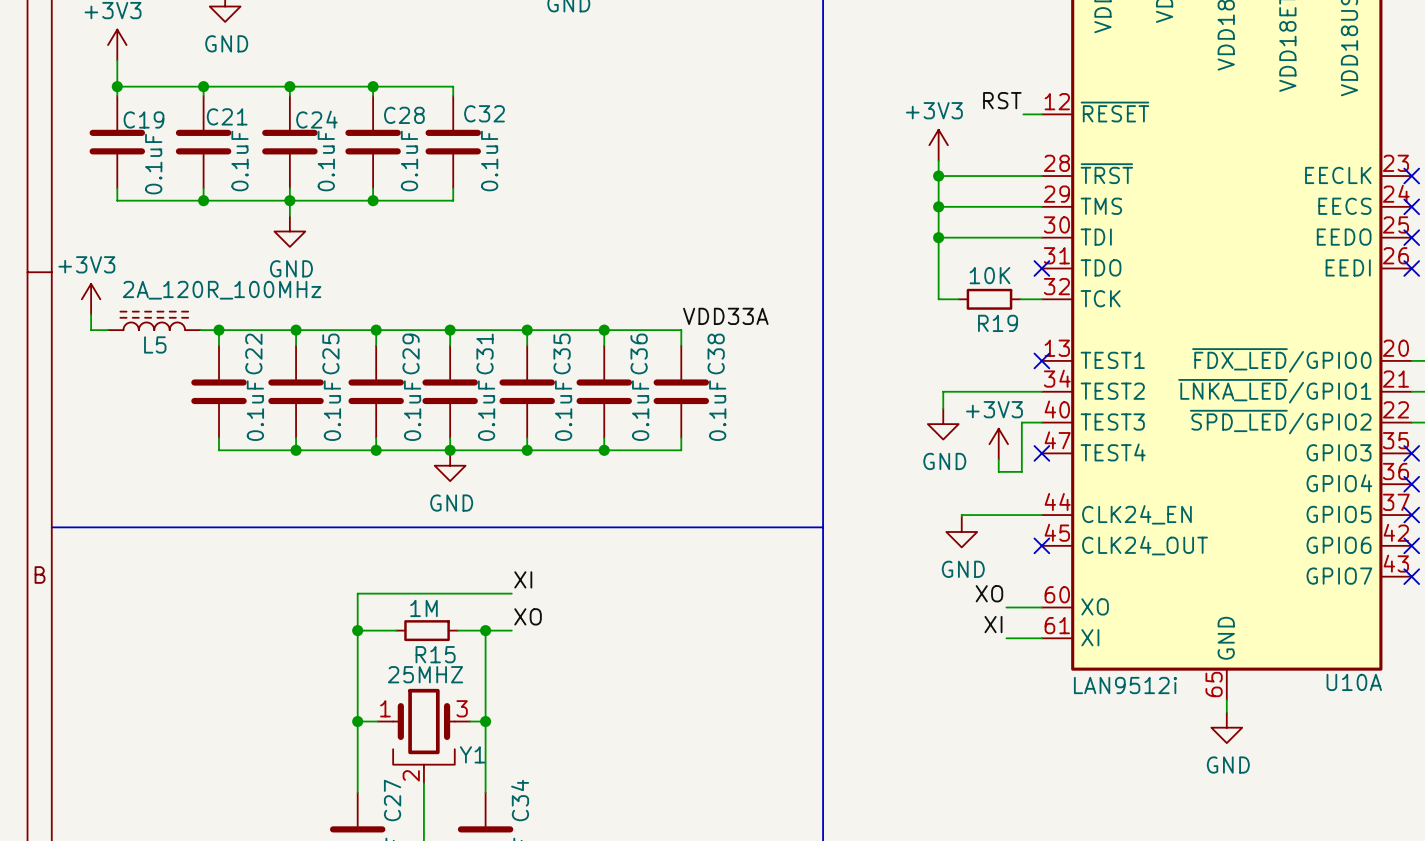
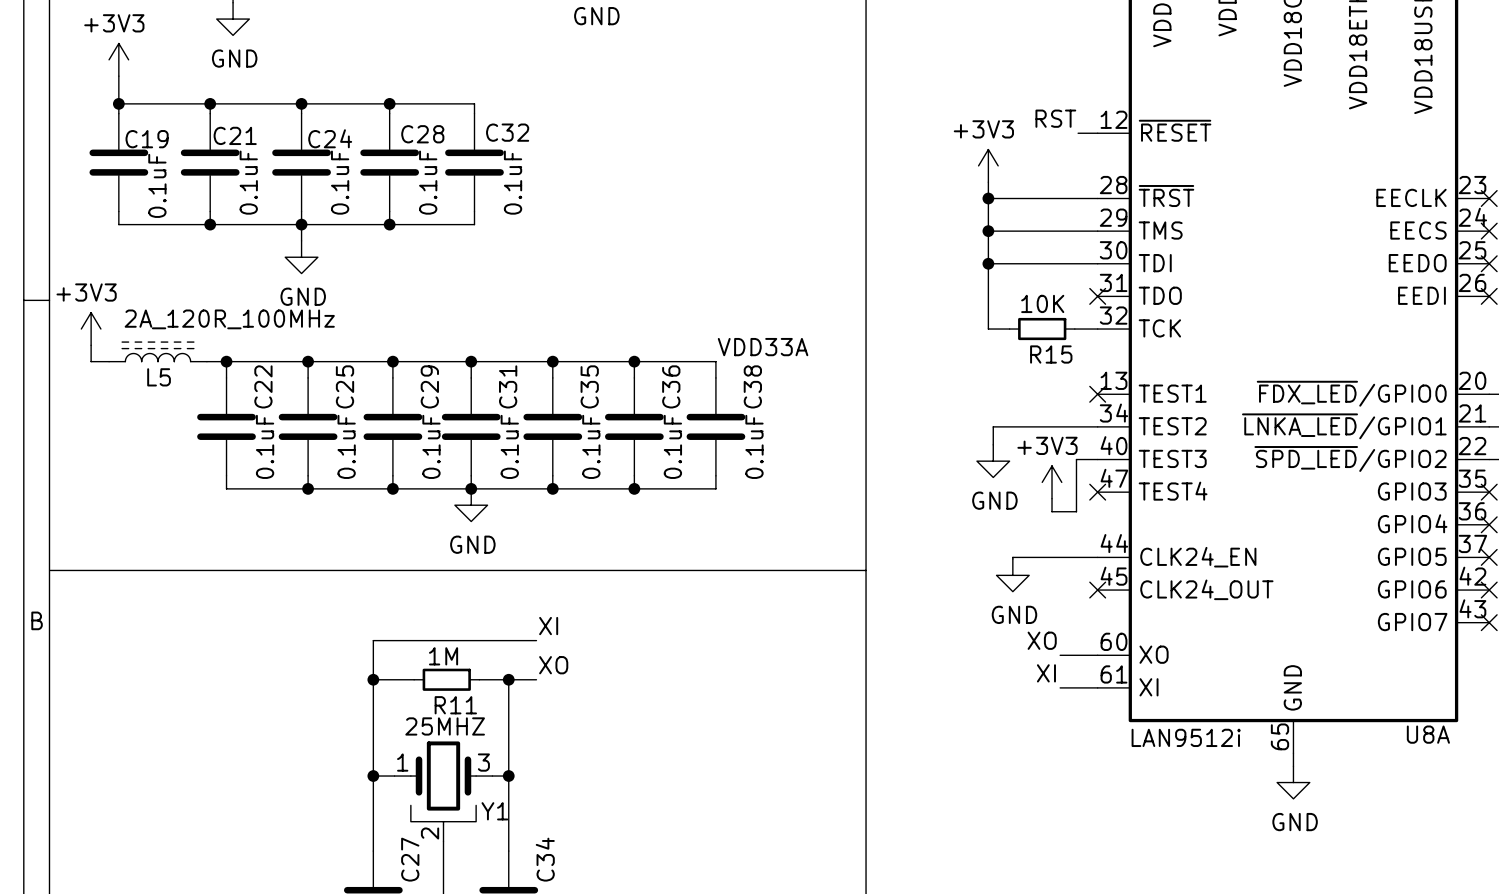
R19 name: R19 (998, 323) -> R15 (1051, 354)
R15 name: R15 (435, 654) -> R11 (455, 705)
U10A name: U10A (1354, 682) -> U8A (1428, 734)

